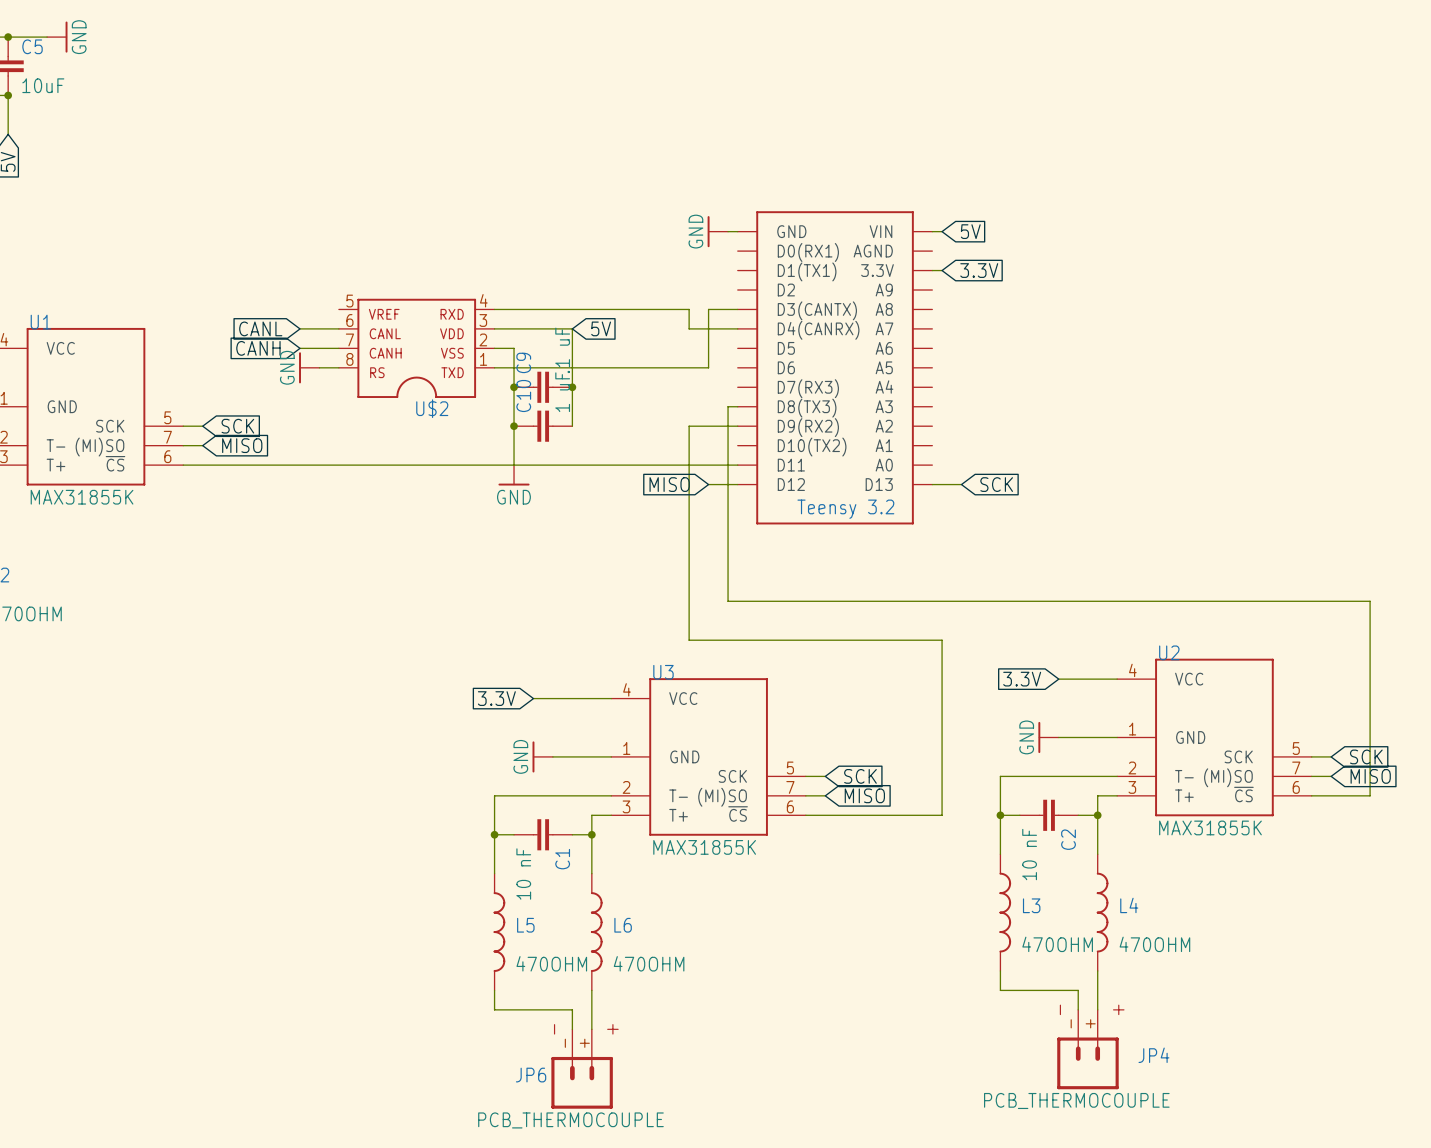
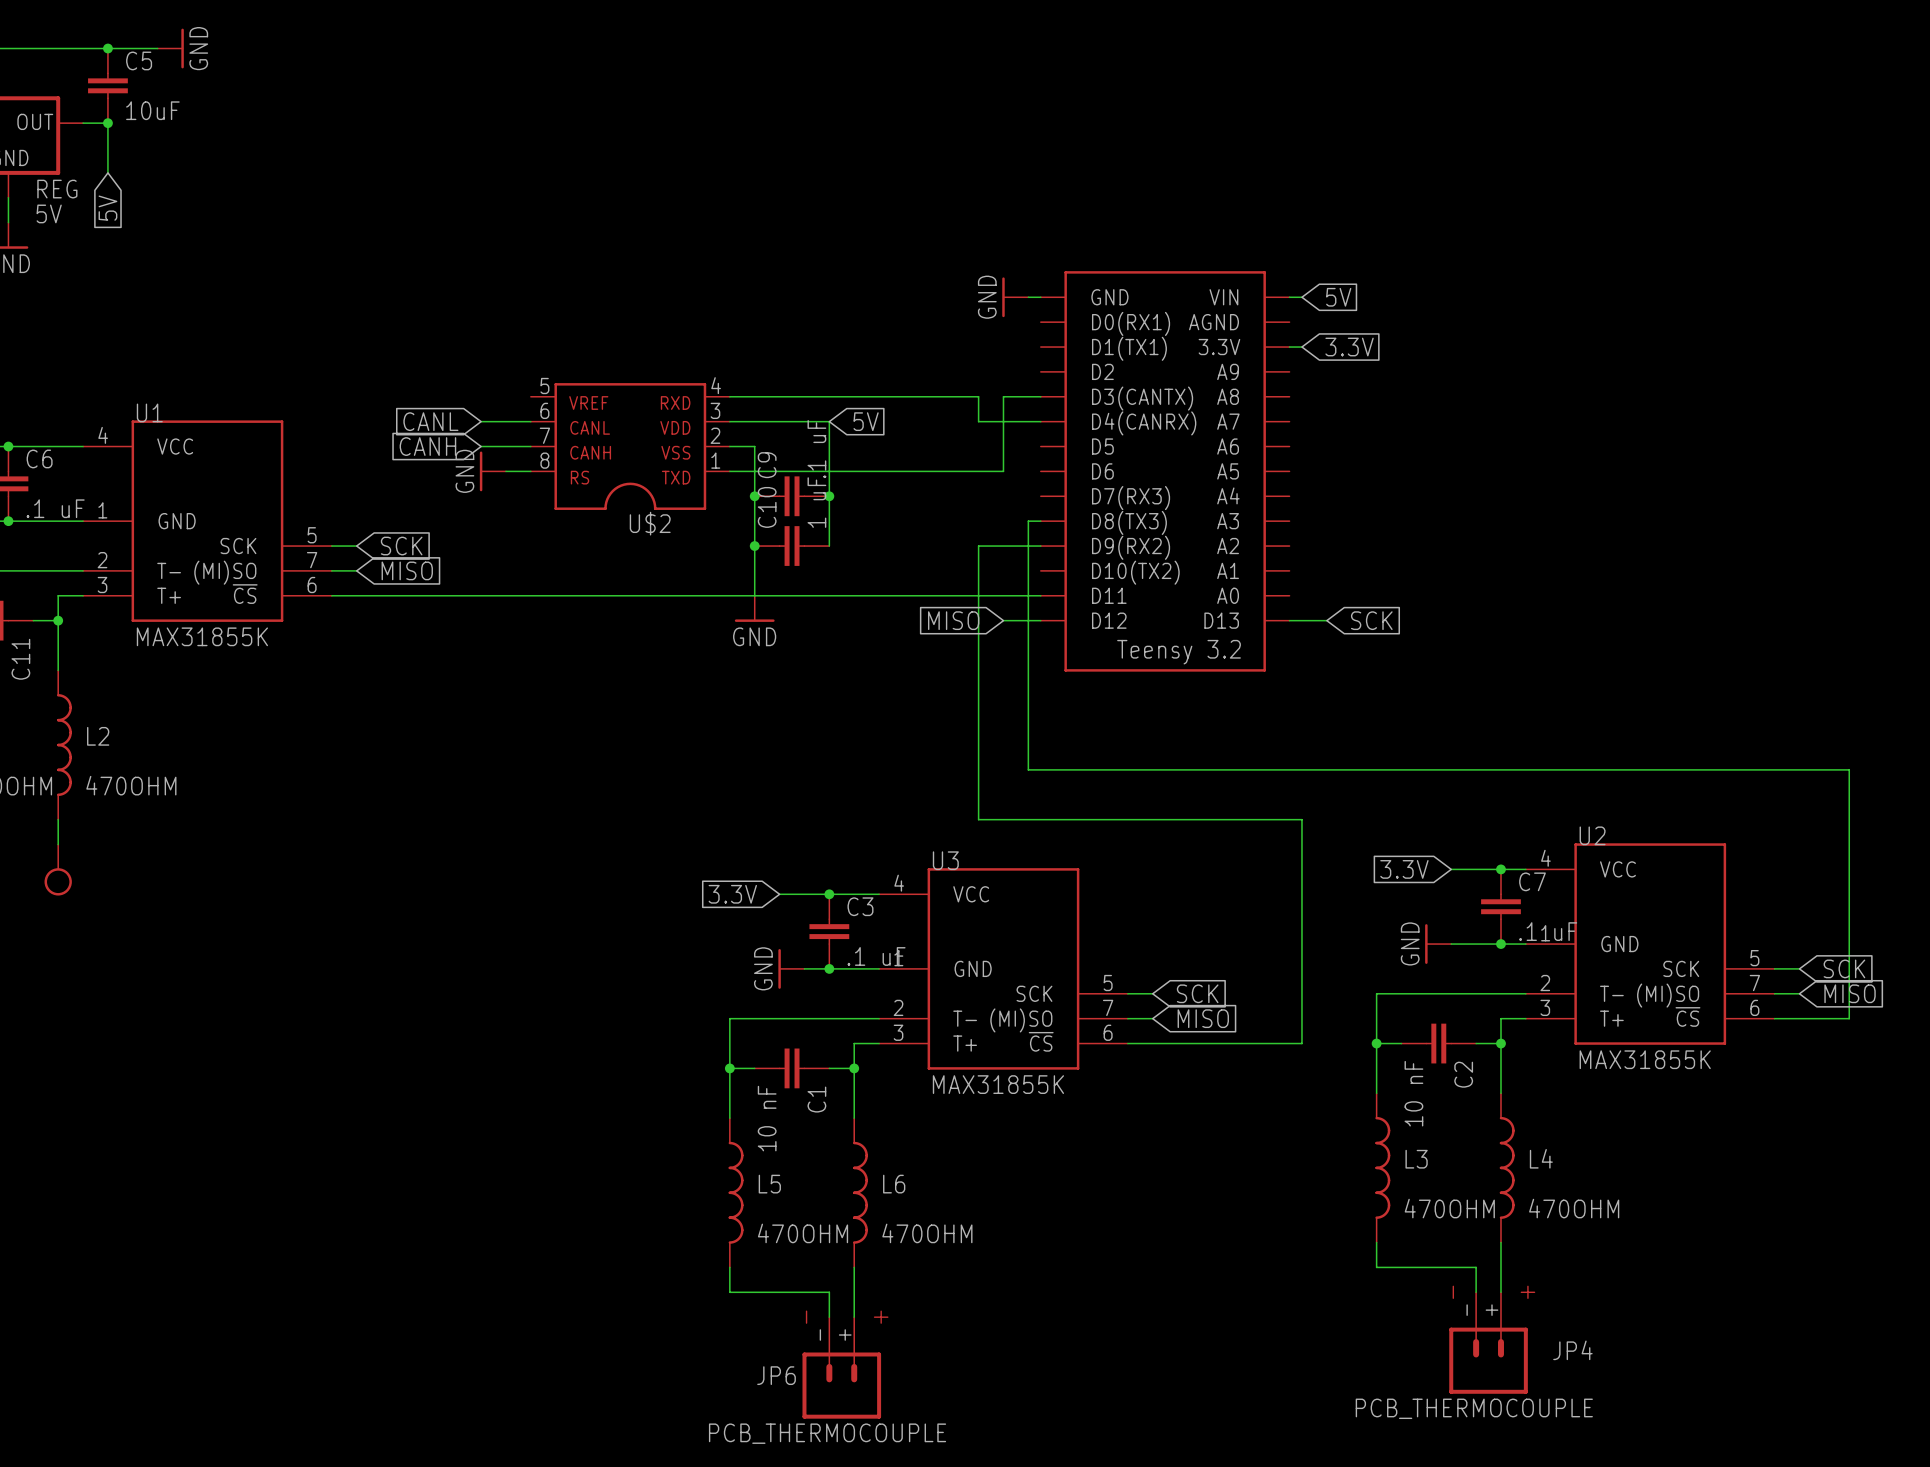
junction: none -> (1500, 869)
junction: none -> (829, 894)
C7: none -> .1 uF (1500, 906)
C3: none -> .1 uF (829, 931)
junction: none -> (1500, 944)
junction: none -> (829, 968)

